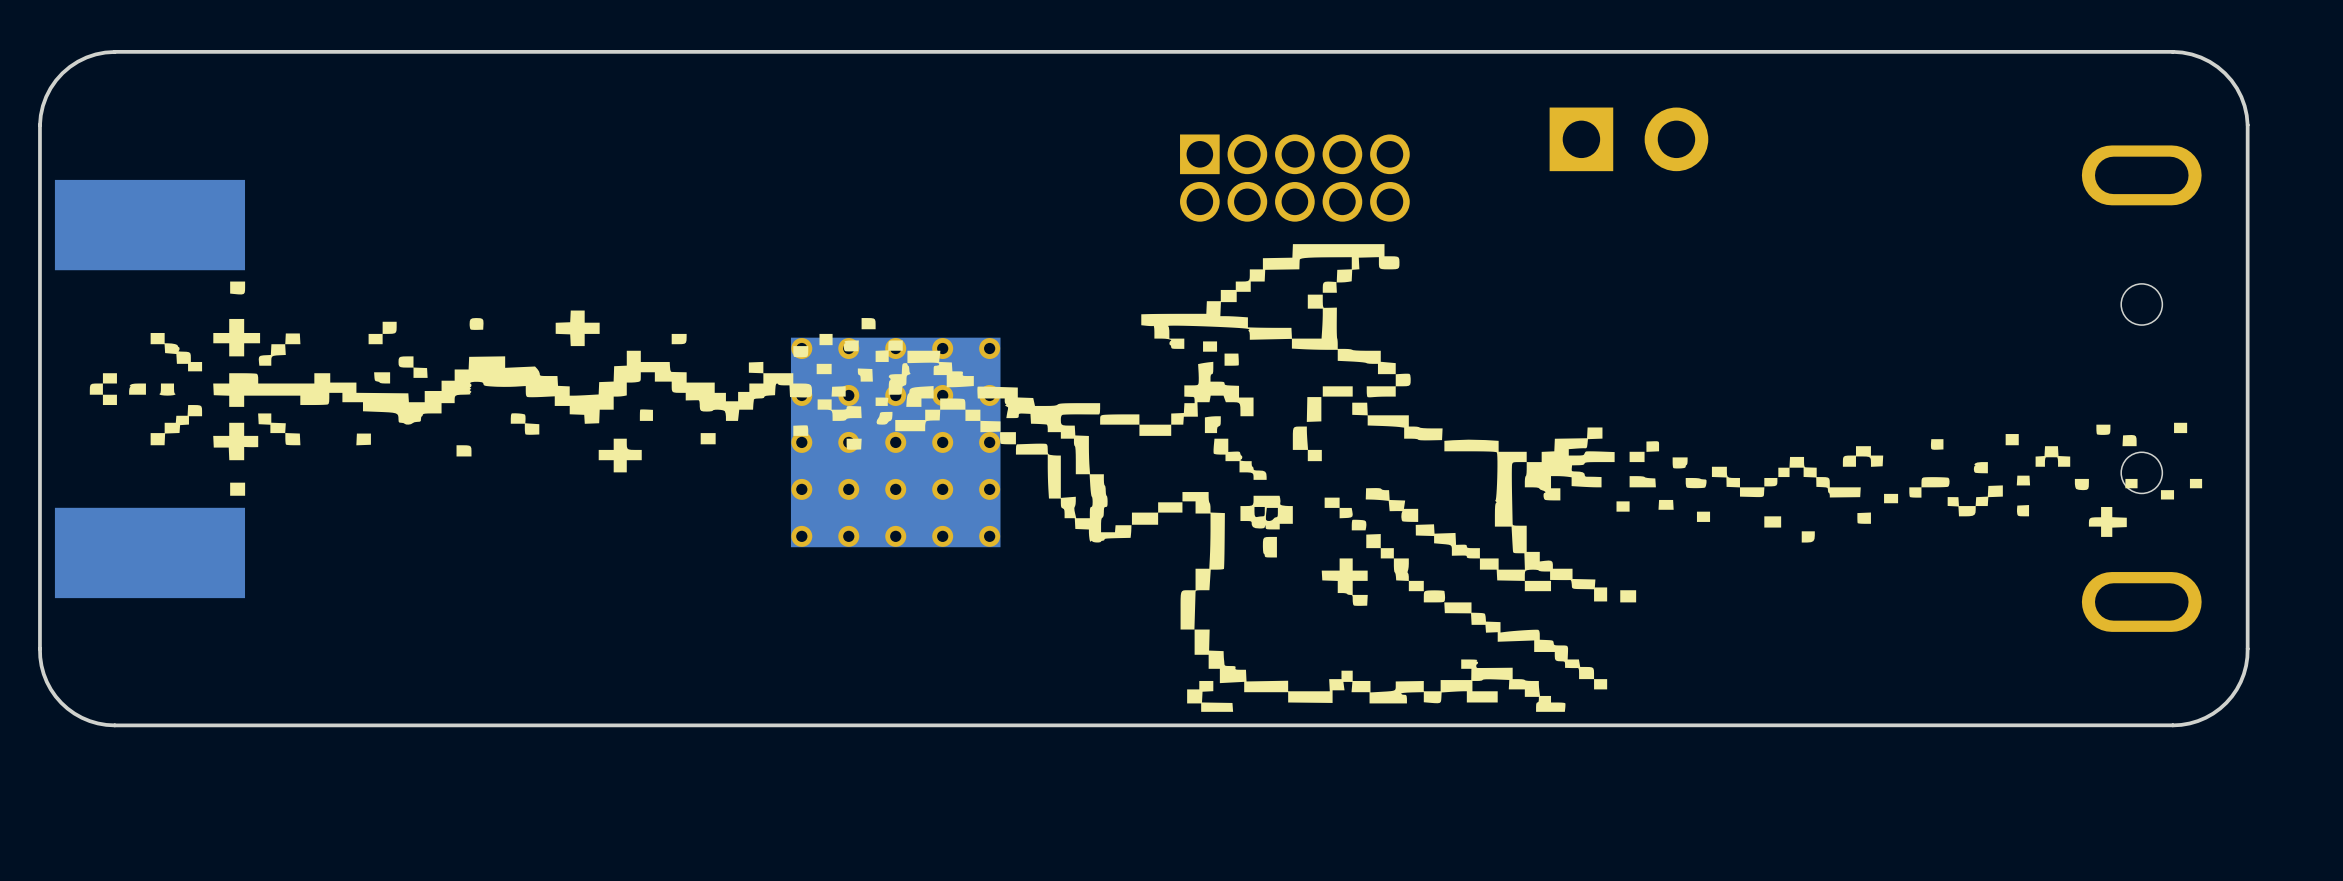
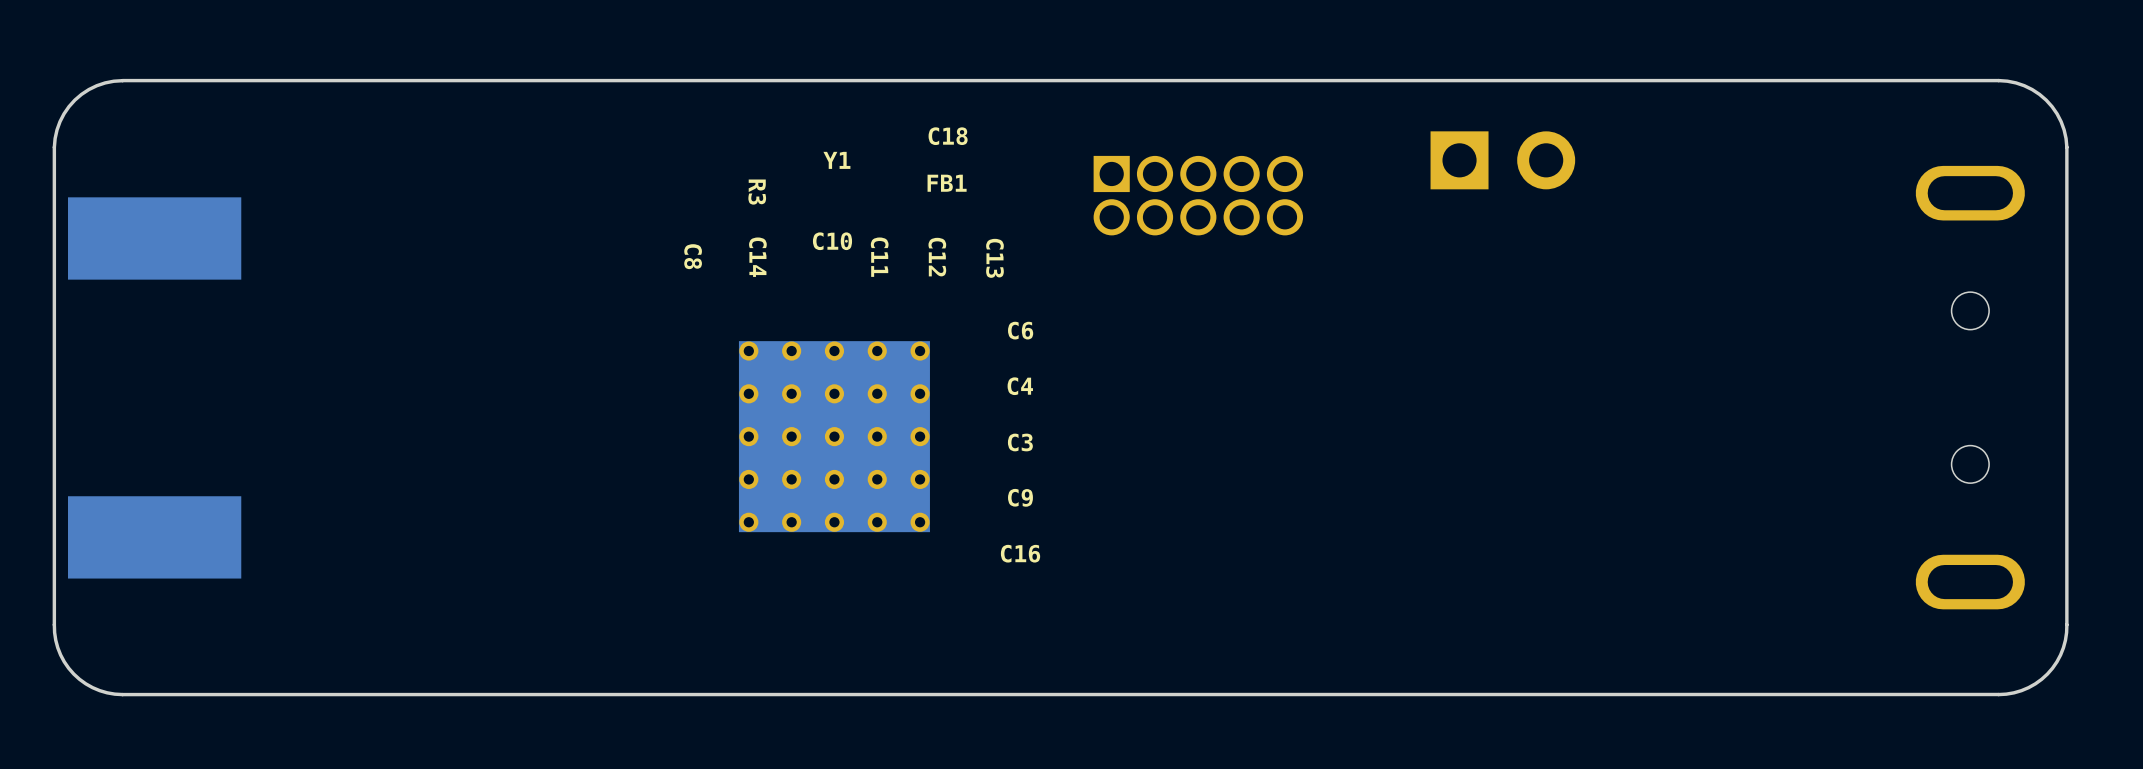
C18: none -> (948, 136)
Y1: none -> (836, 160)
FB1: none -> (947, 183)
R3: none -> (757, 192)
C10: none -> (832, 241)
drawing: [89, 244, 2203, 712] -> none
C8: none -> (693, 256)
C14: none -> (757, 257)
C11: none -> (879, 257)
C12: none -> (937, 257)
C13: none -> (994, 258)
C6: none -> (1020, 330)
C4: none -> (1020, 386)
C3: none -> (1020, 442)
C9: none -> (1020, 497)
C16: none -> (1020, 553)

